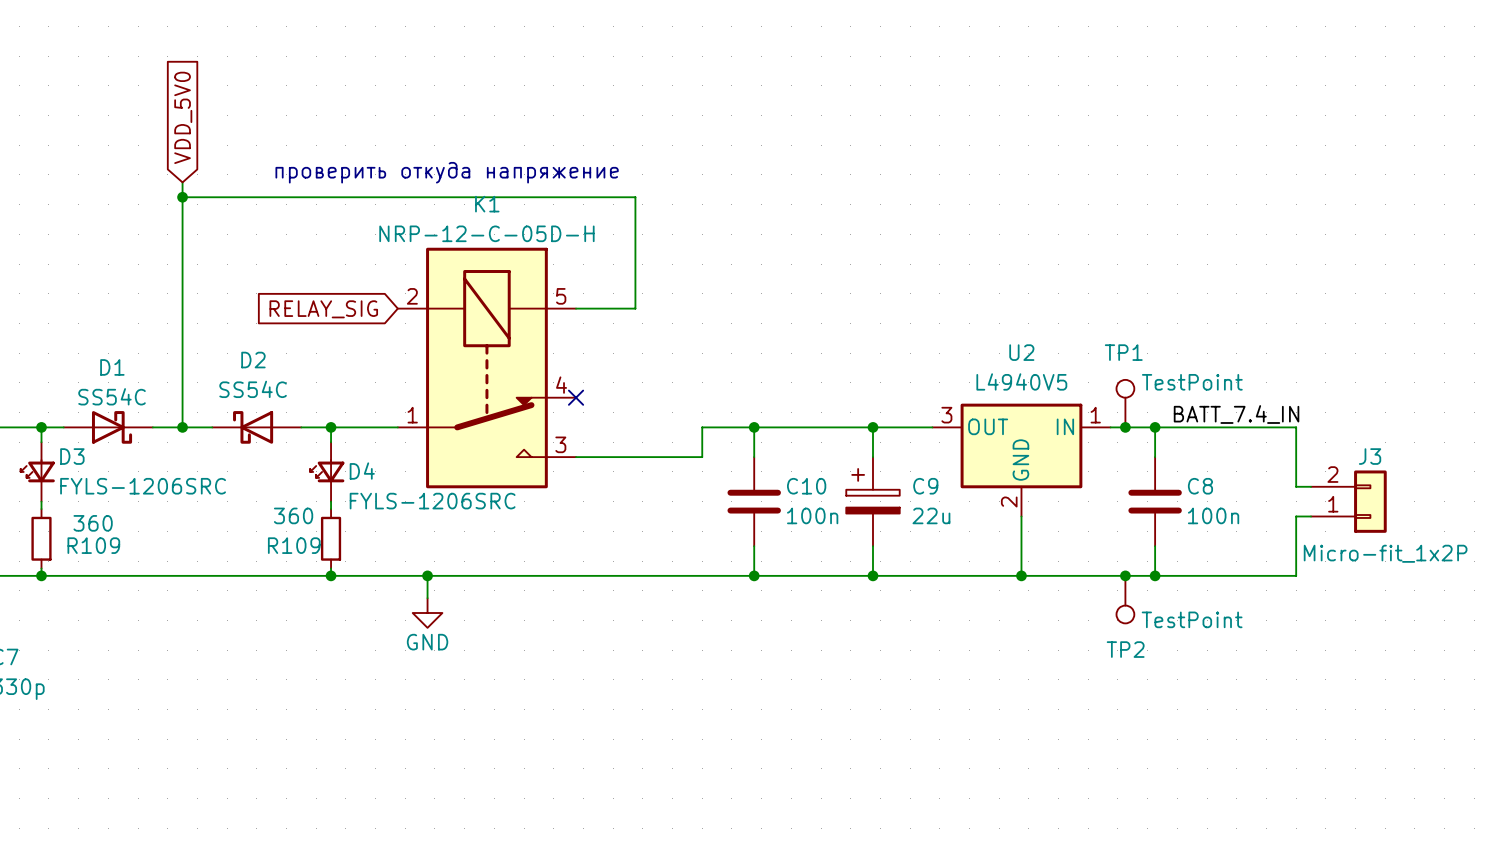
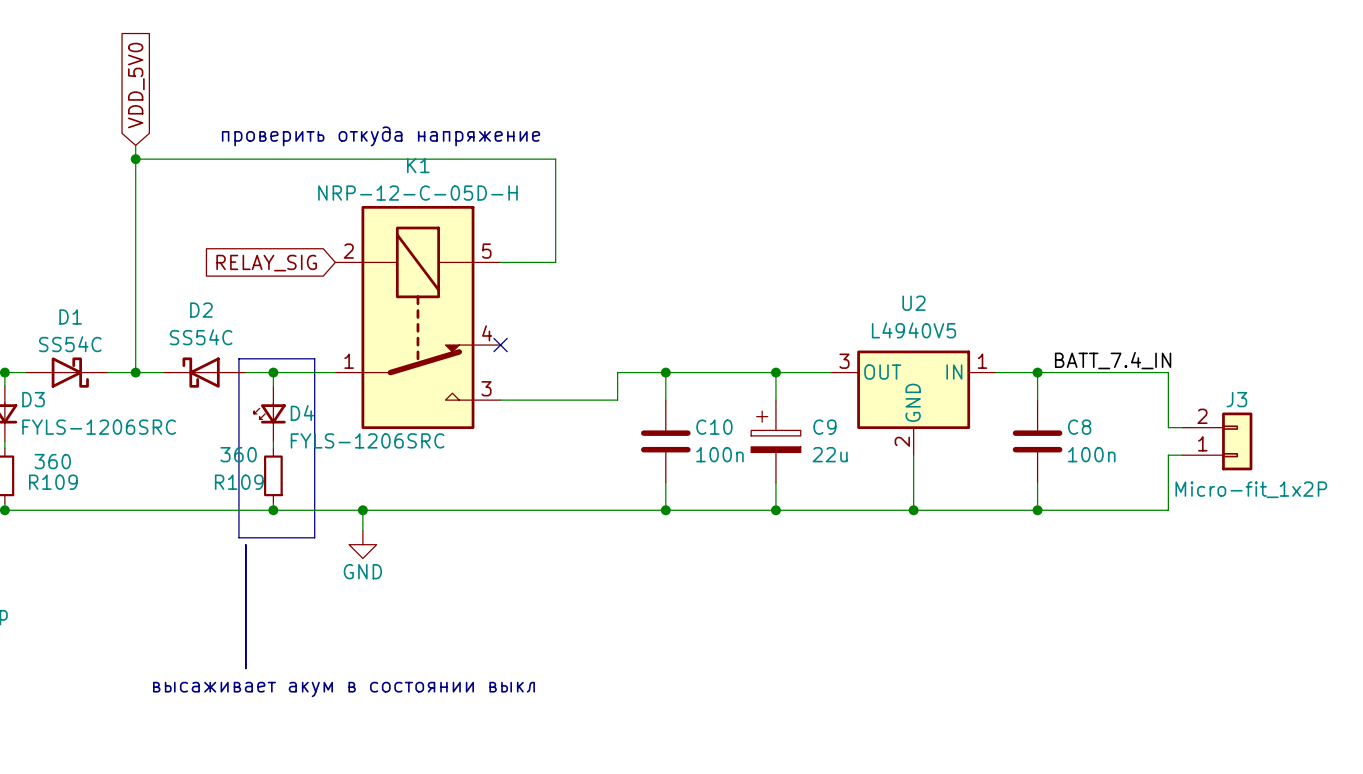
TP1: TestPoint (1125, 403) -> none
line: none -> (238, 358) (314, 358) (314, 537) (238, 537) (238, 358)
junction: (1125, 427) -> none
junction: (1125, 575) -> none
TP2: TestPoint (1125, 599) -> none
line: none -> (245, 544) (245, 668)
text: none -> высаживает акум в состоянии выкл (343, 689)

